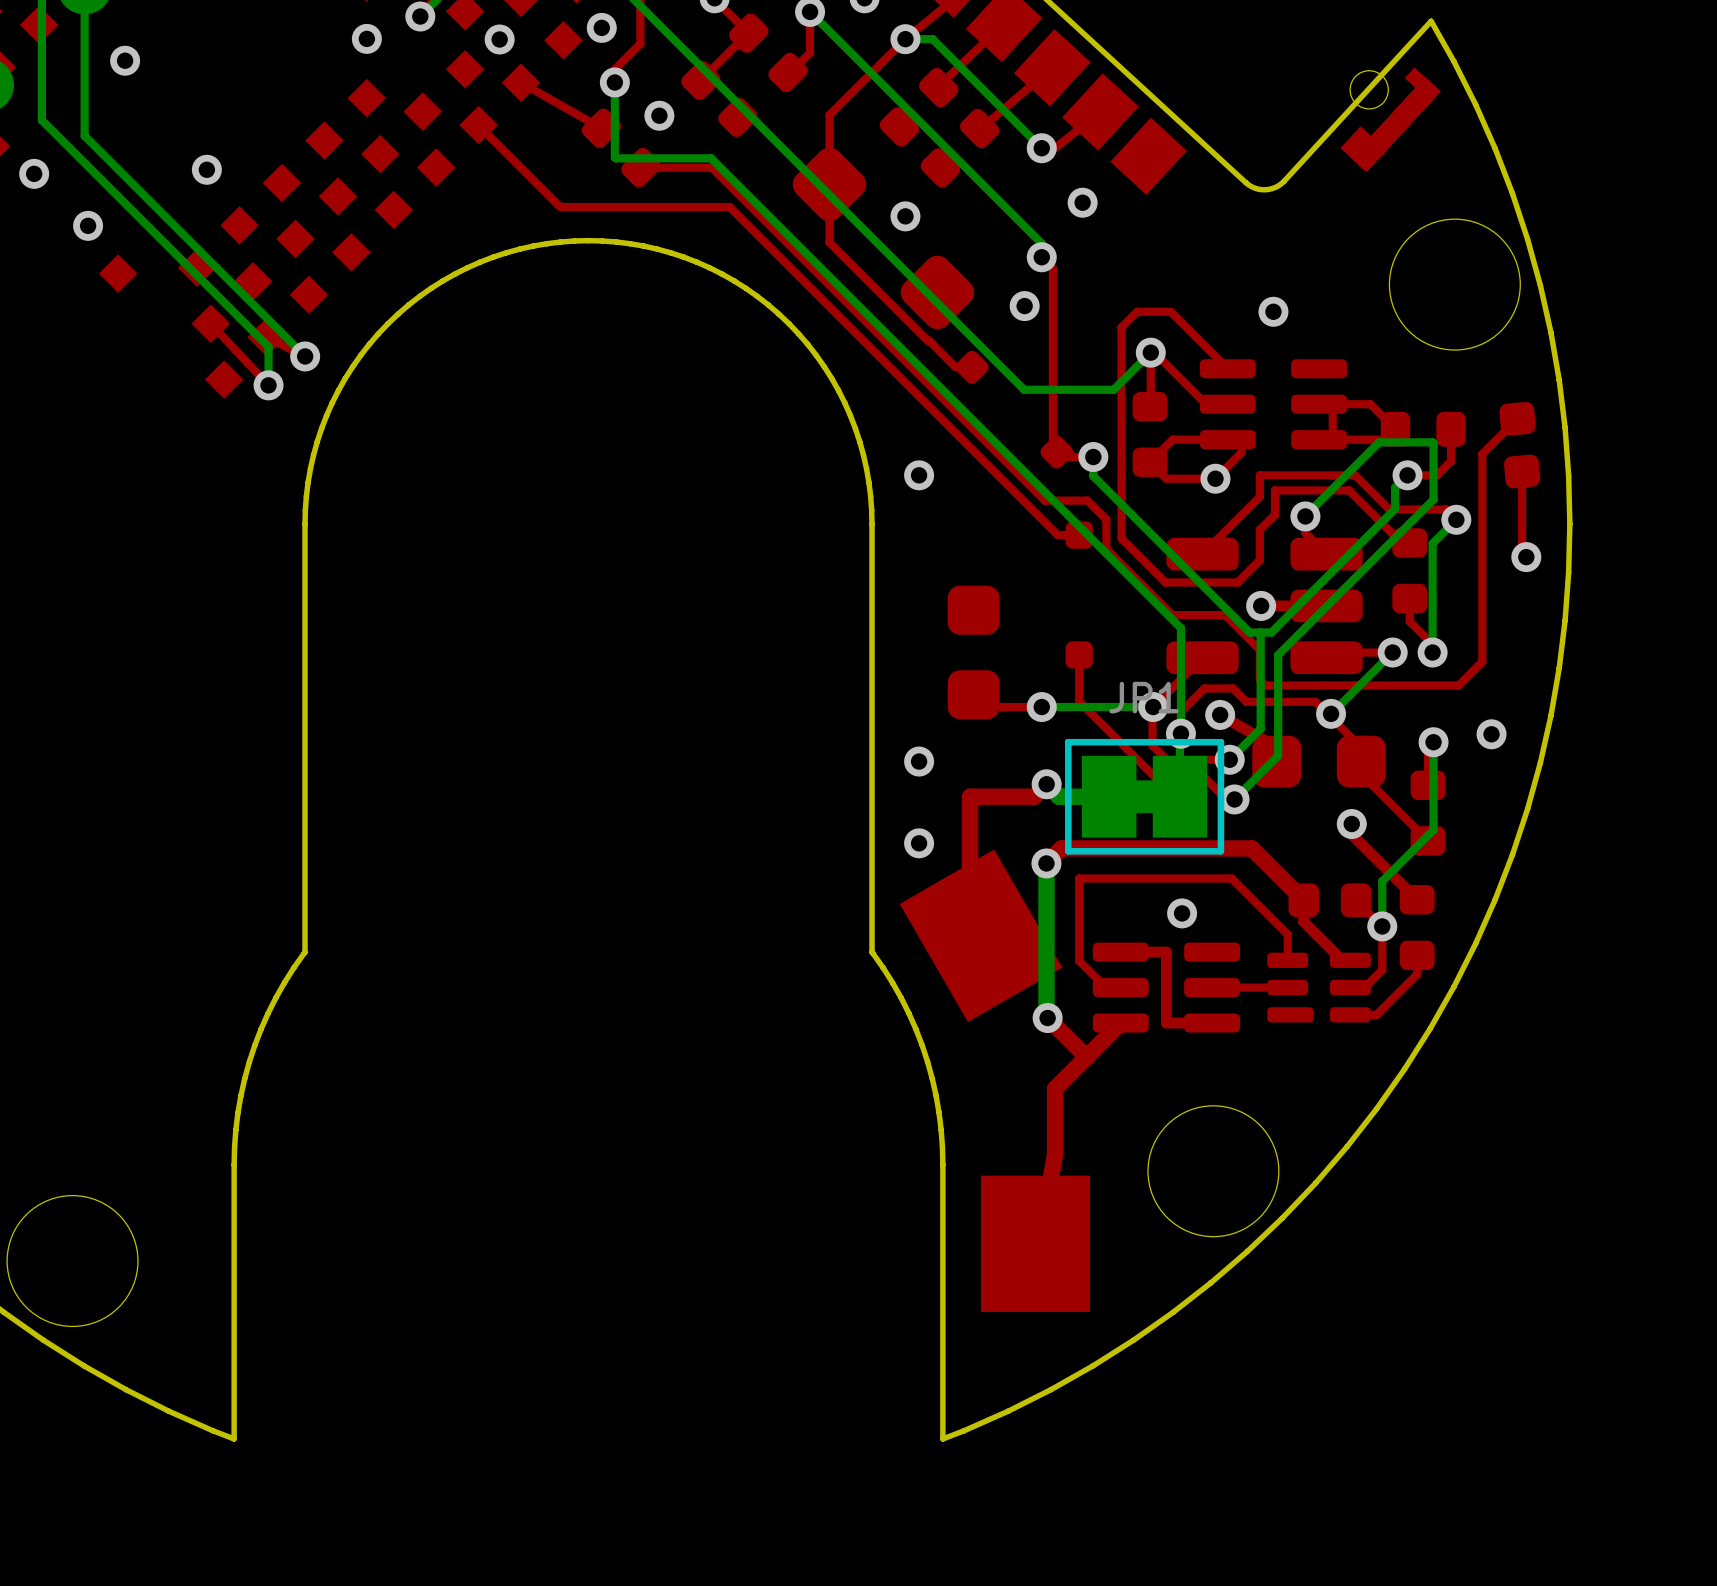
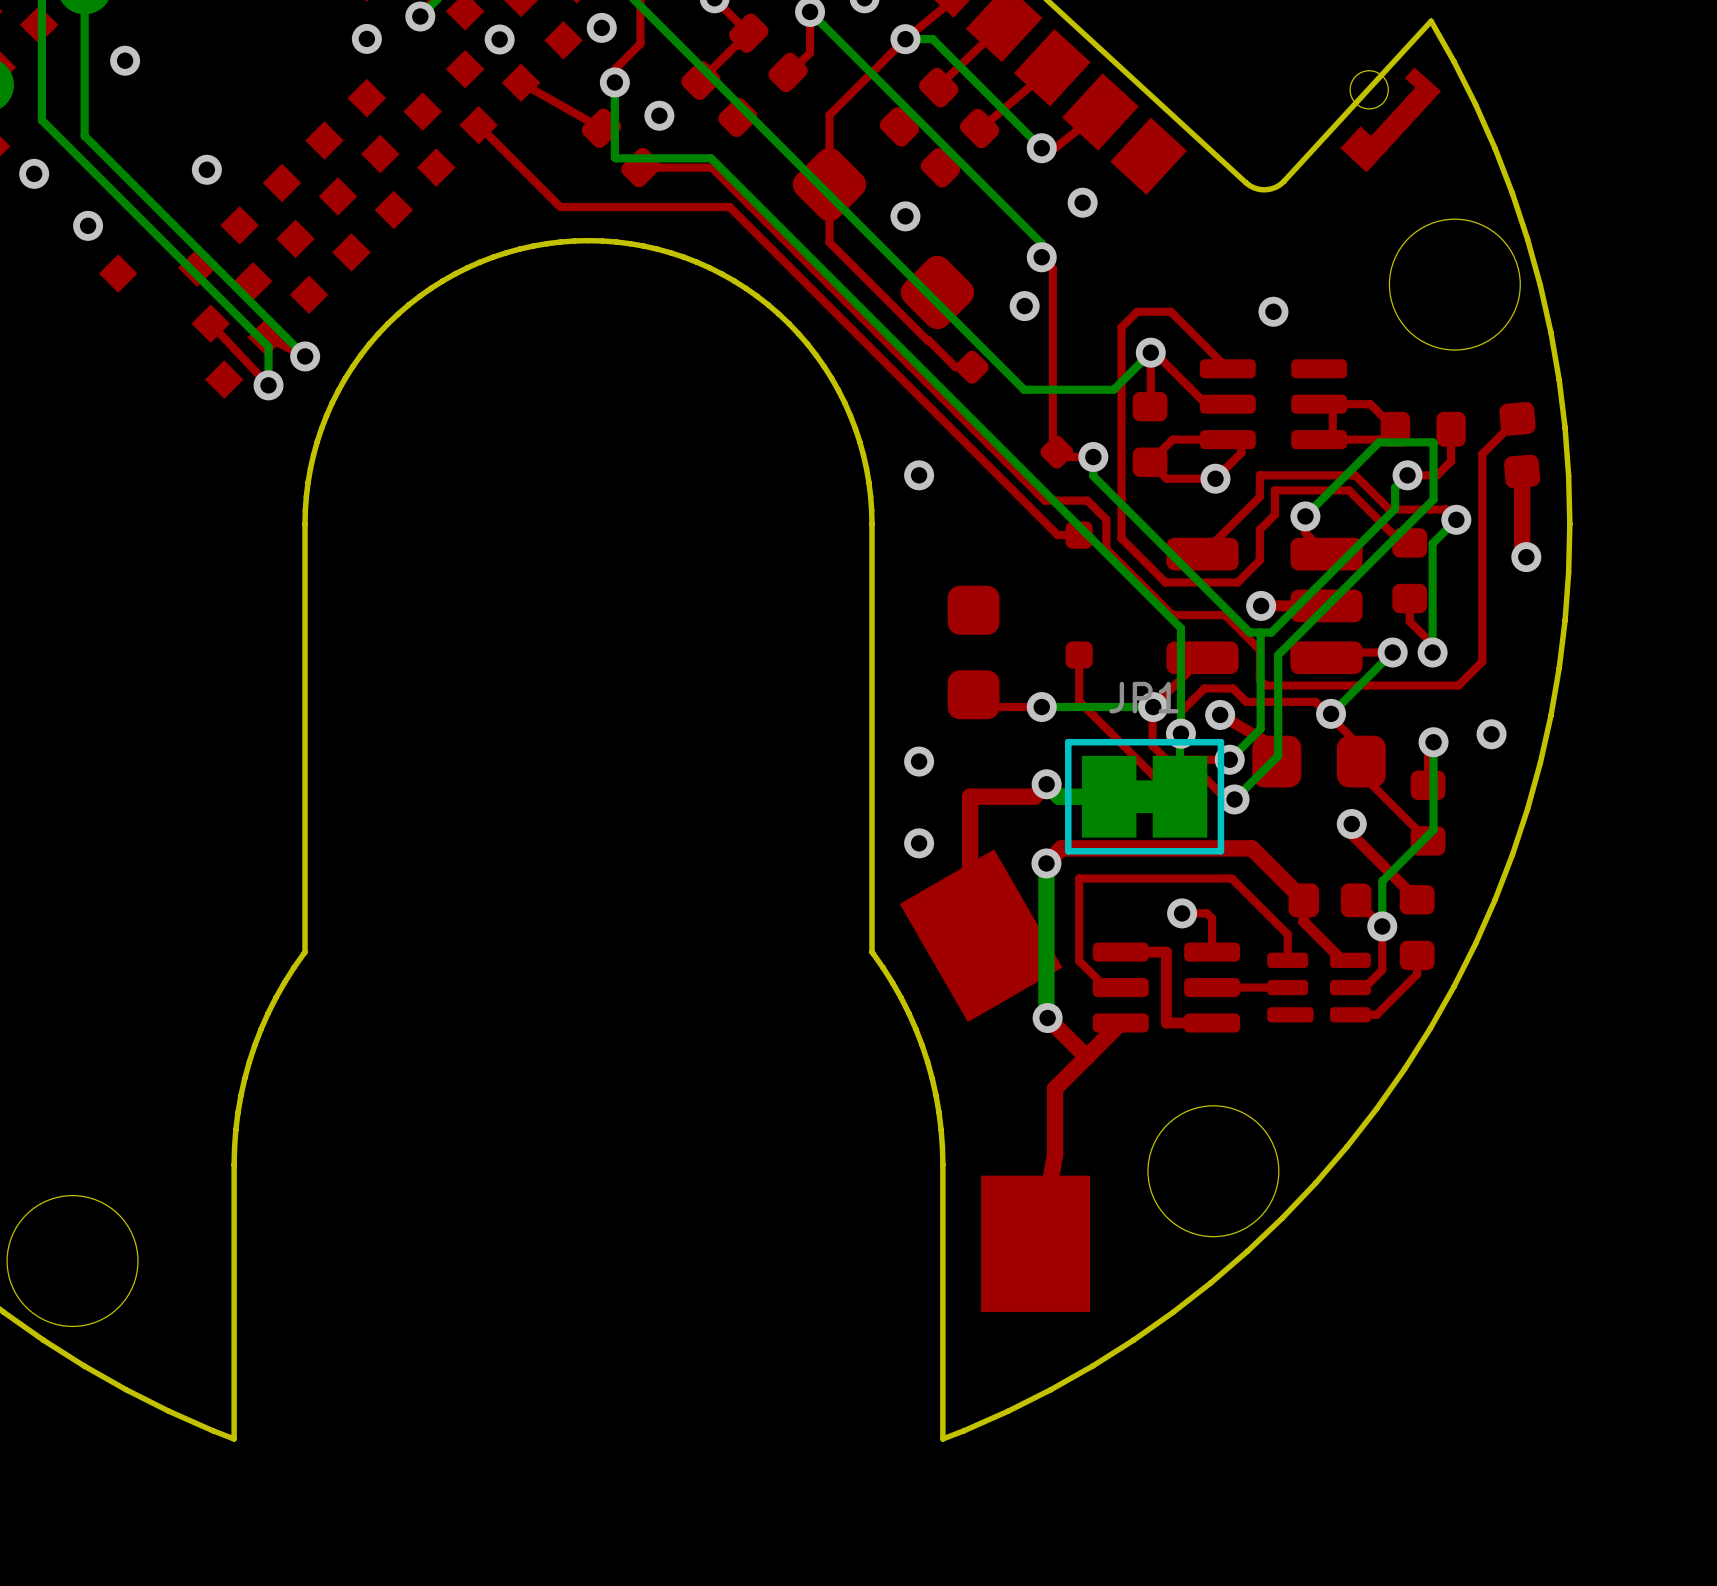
top track width: thin (1522, 471) (1522, 552) (1526, 557) -> thick (1522, 471) (1522, 552) (1526, 557)
top track: none -> (1182, 913) (1207, 913) (1212, 918) (1212, 952)

